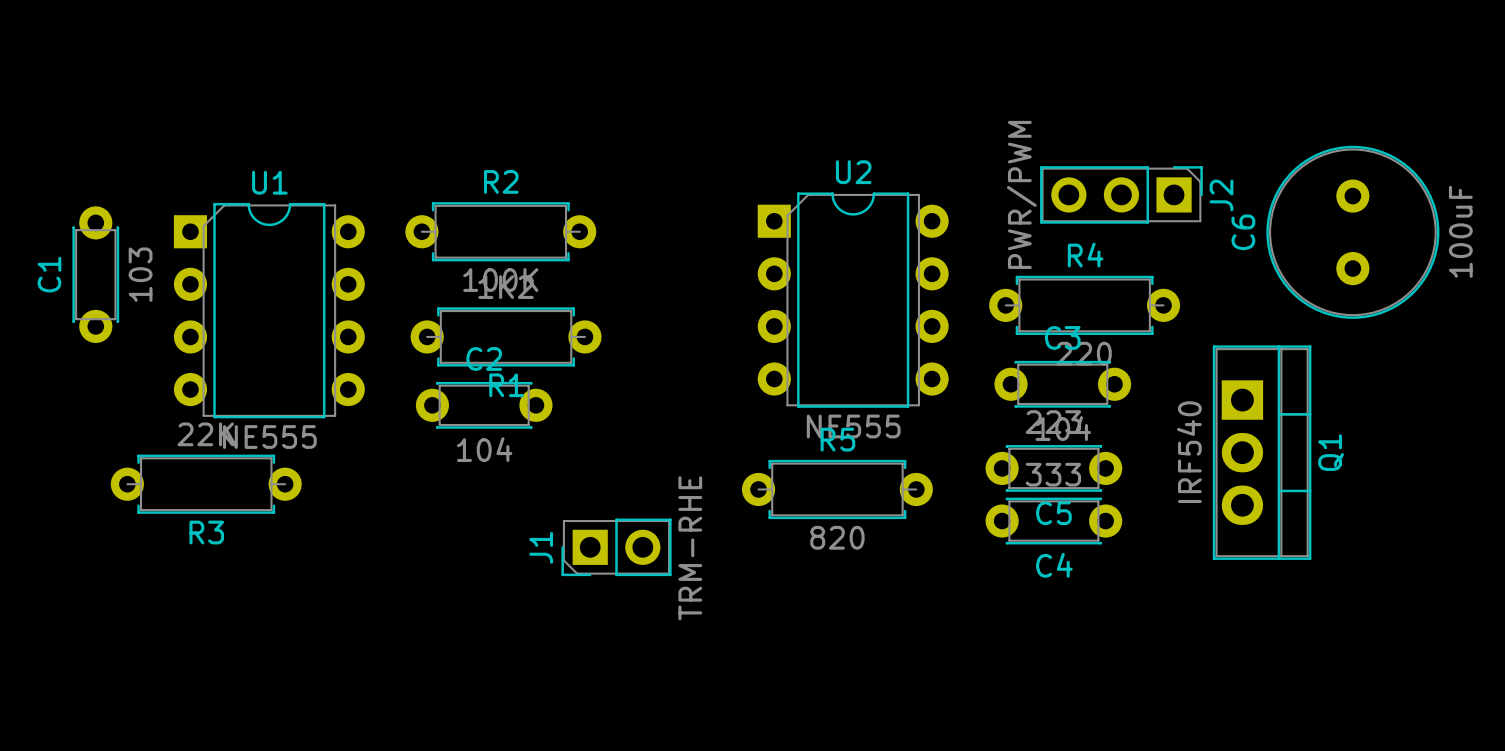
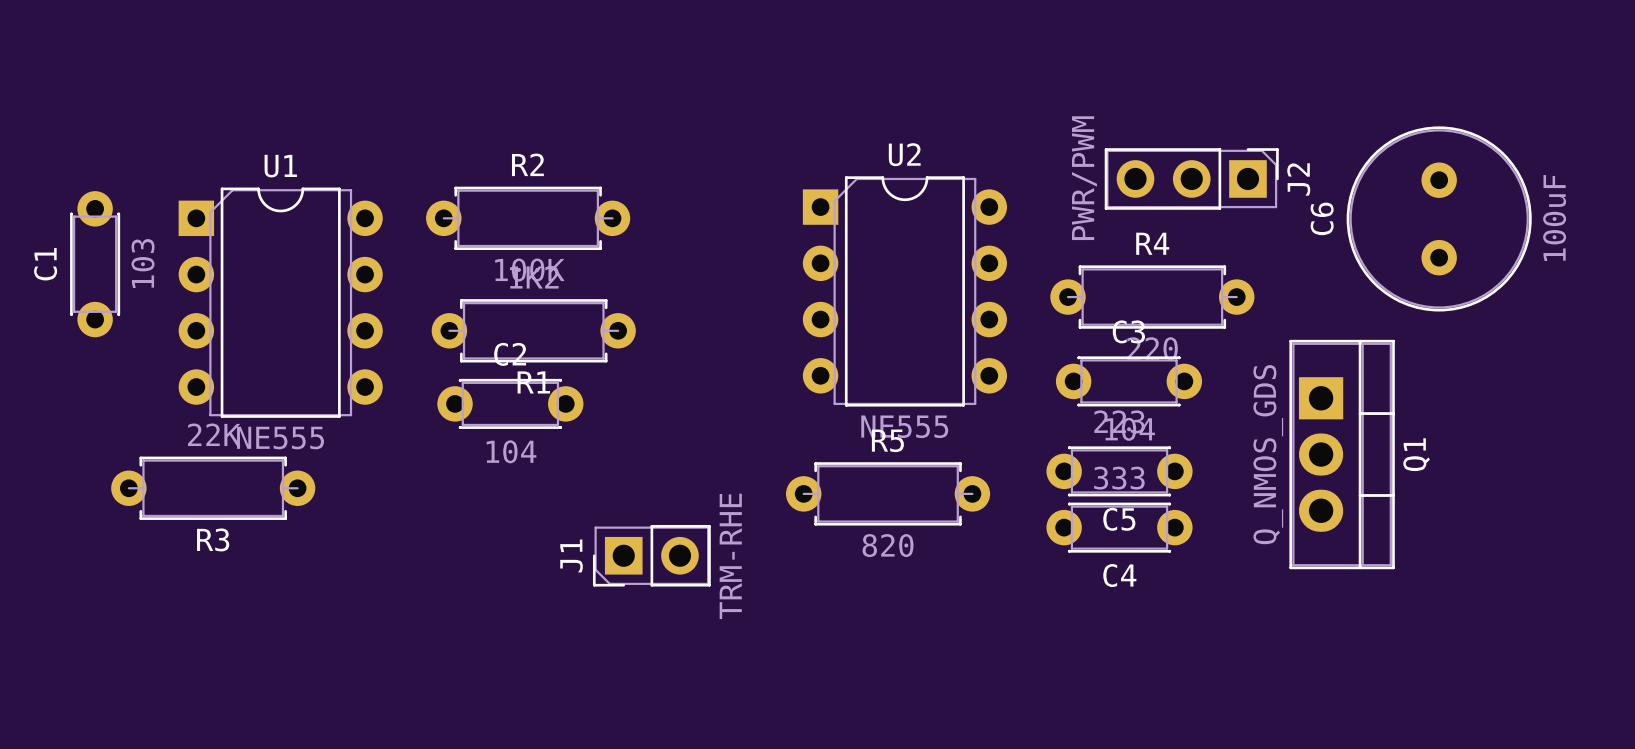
Q1 value: IRF540 (1189, 452) -> Q_NMOS_GDS (1268, 454)

